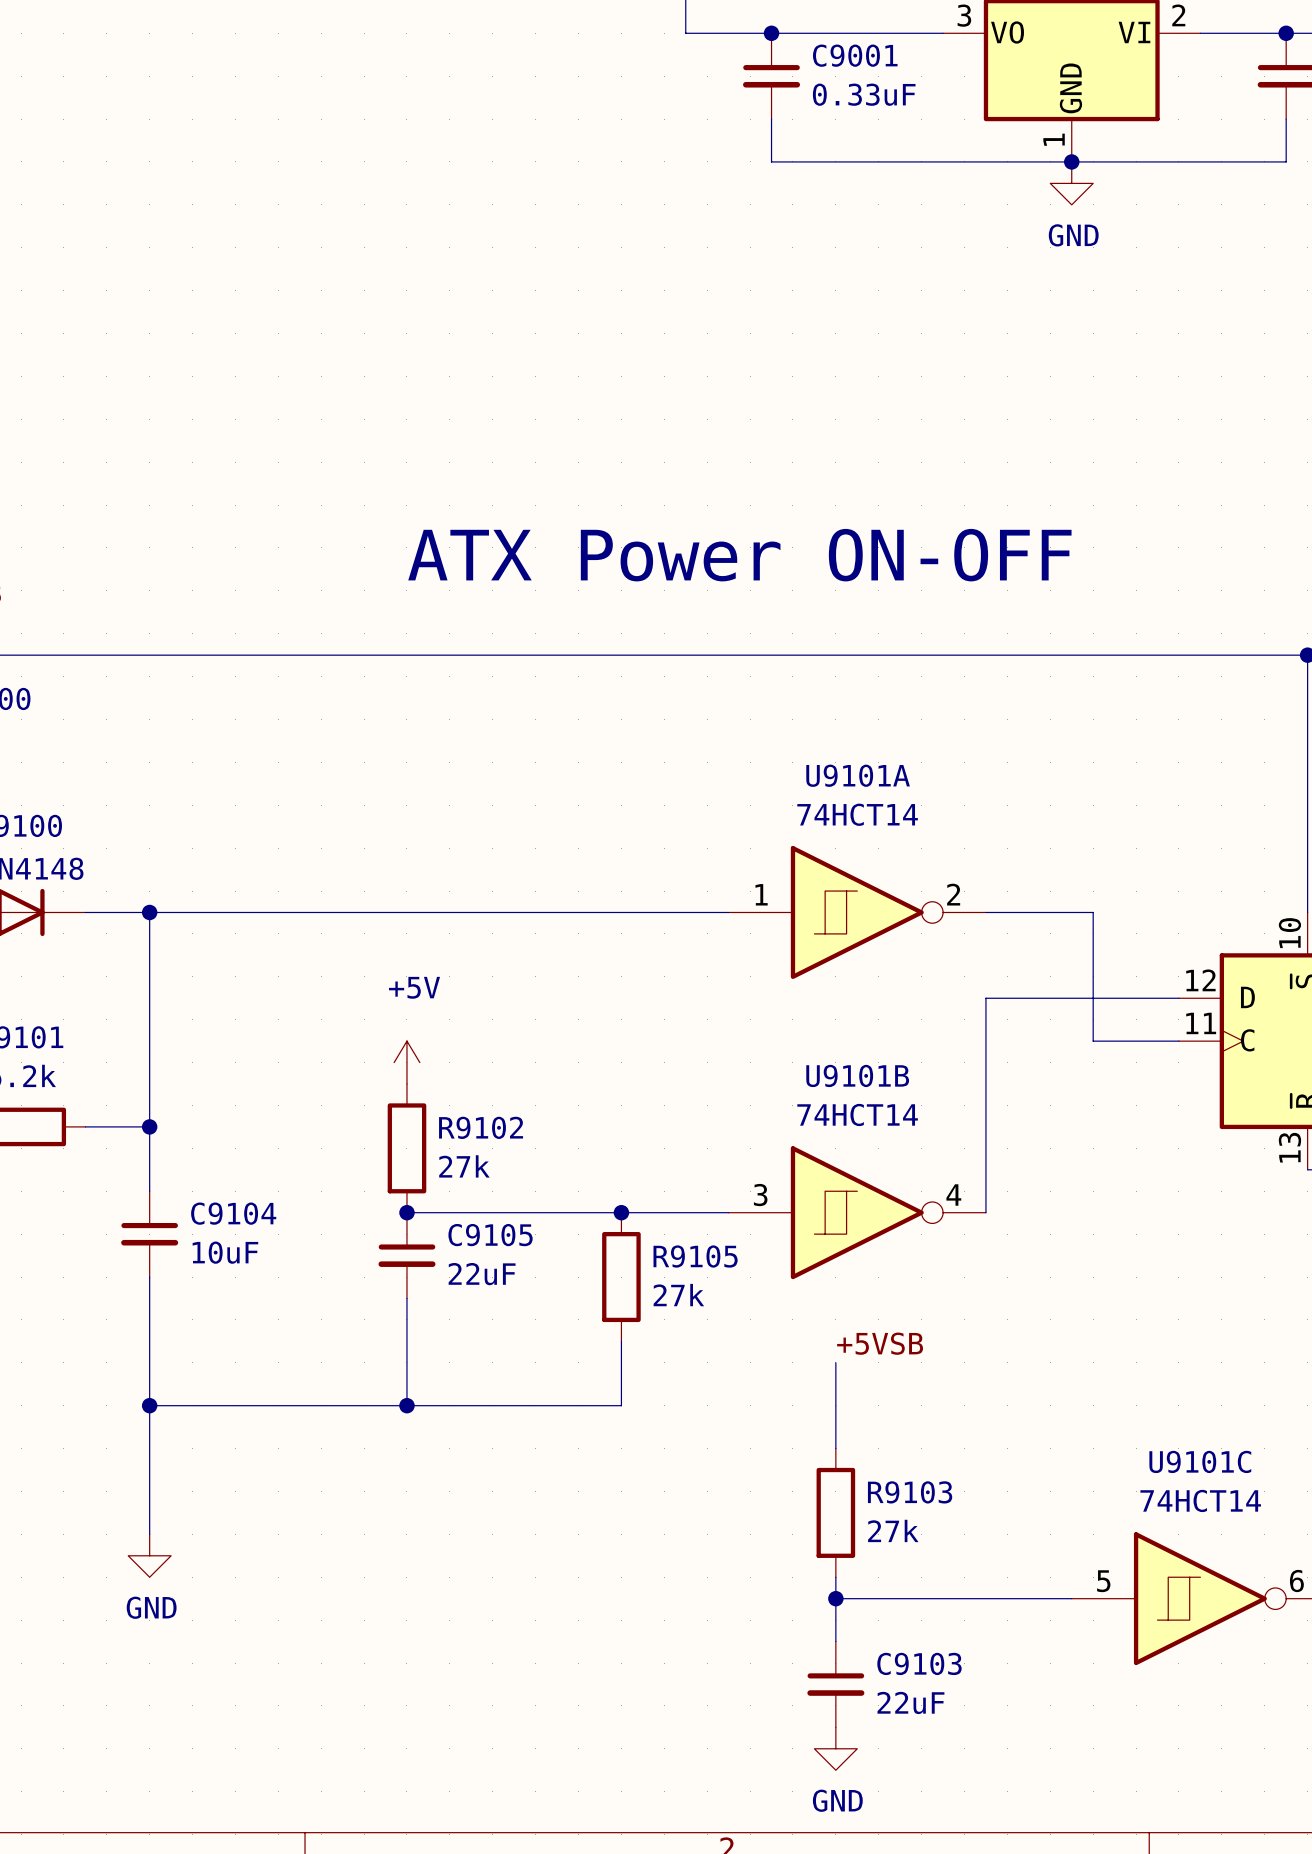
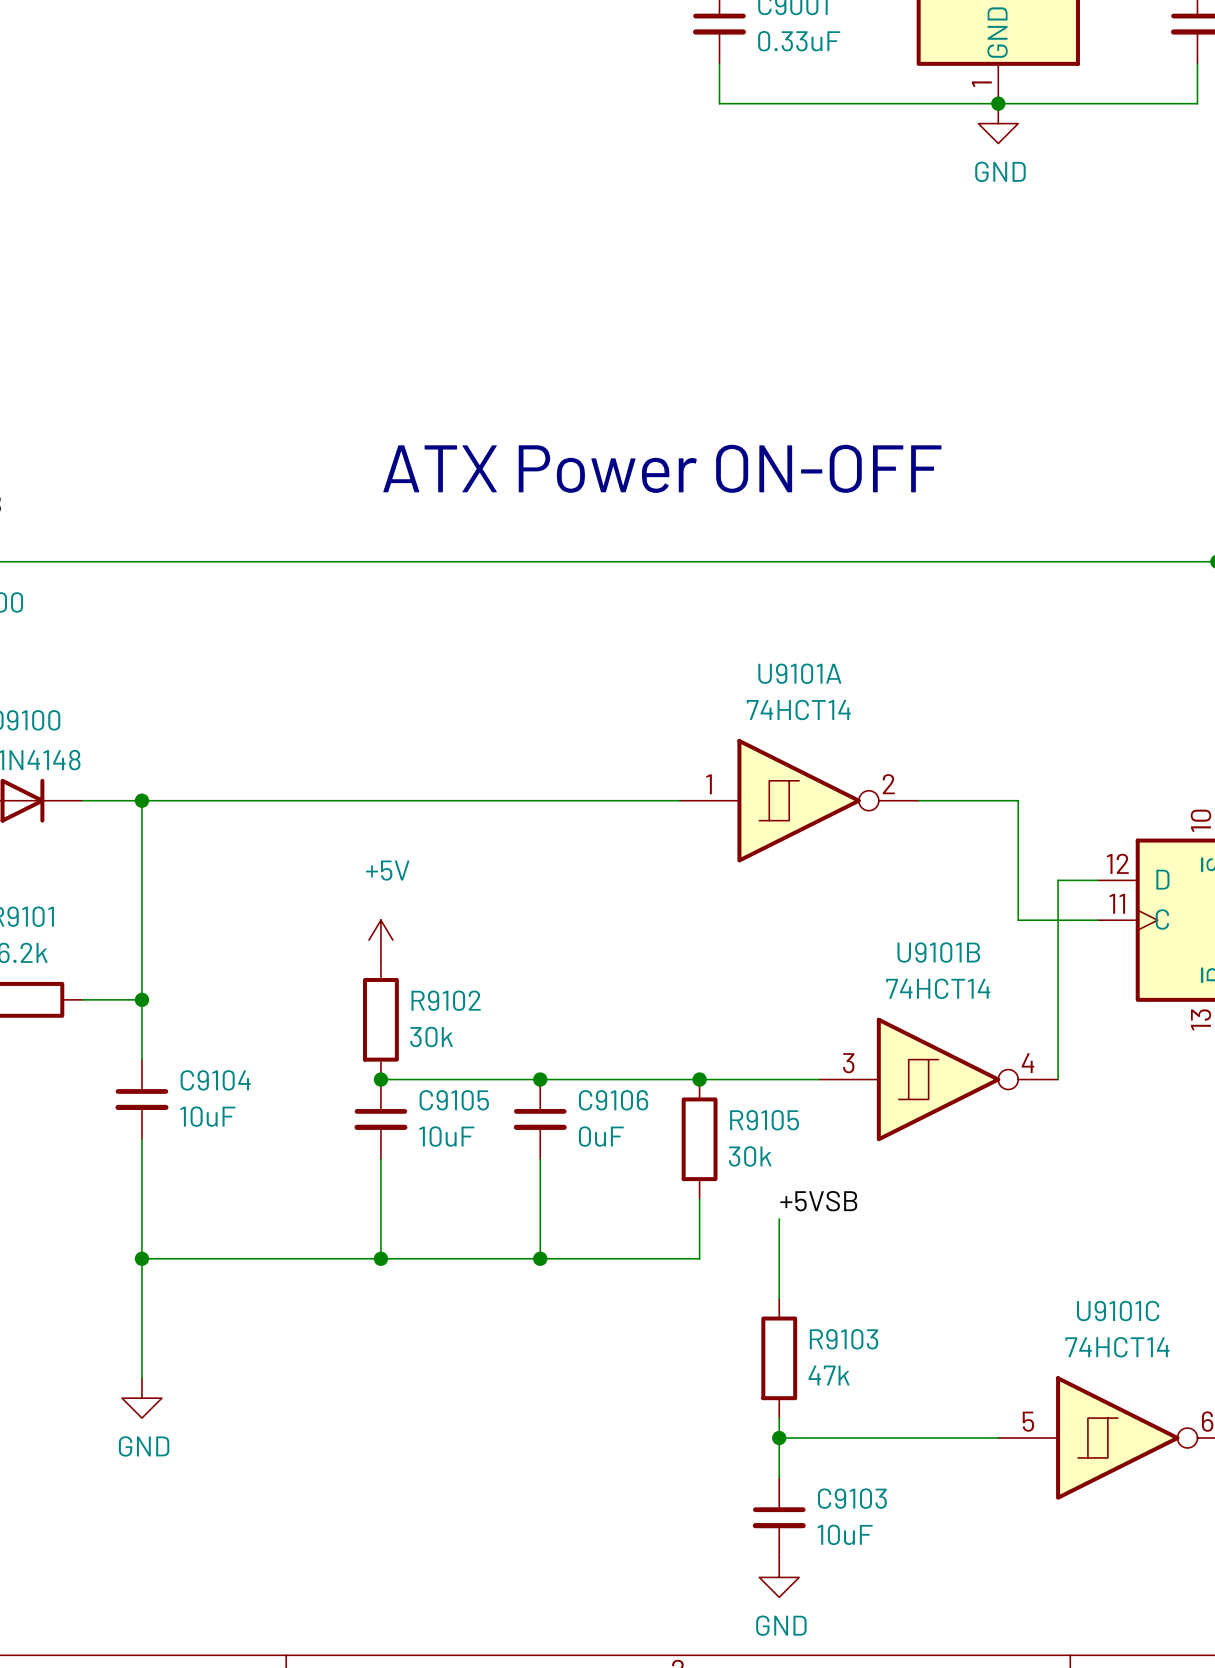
wire: (1136, 998) (985, 998) (985, 1212) -> (1058, 880) (1058, 1079)
R9102 value: 27k (464, 1166) -> 30k (431, 1036)
junction position: (621, 1212) -> (540, 1079)
junction: none -> (699, 1079)
U9101B position: (857, 1212) -> (938, 1079)
C9106: none -> 0uF (540, 1119)
C9105 value: 22uF (482, 1274) -> 10uF (446, 1136)
R9105 position: (621, 1277) -> (699, 1139)
R9105 value: 27k (678, 1295) -> 30k (750, 1156)
wire: none -> (540, 1159) (540, 1258)
wire: (621, 1341) (621, 1405) -> (699, 1199) (699, 1258) (580, 1258)
junction: none -> (540, 1258)
R9103 value: 27k (893, 1530) -> 47k (829, 1375)
C9103 value: 22uF (910, 1702) -> 10uF (845, 1534)

